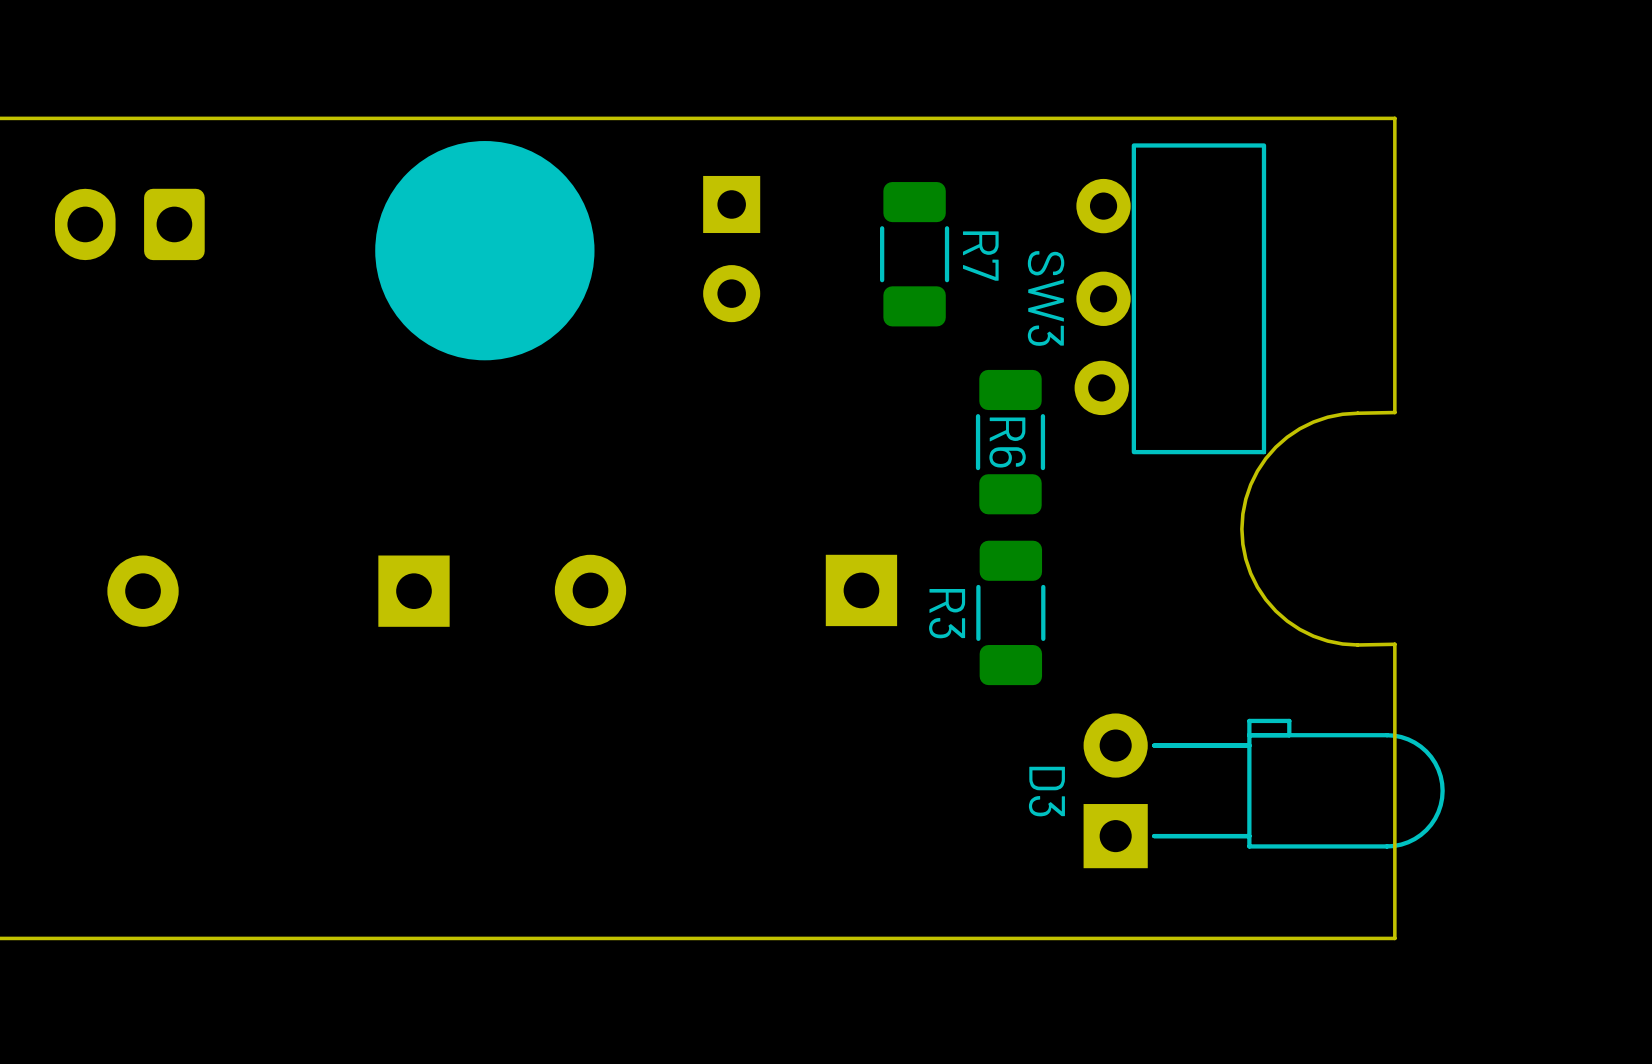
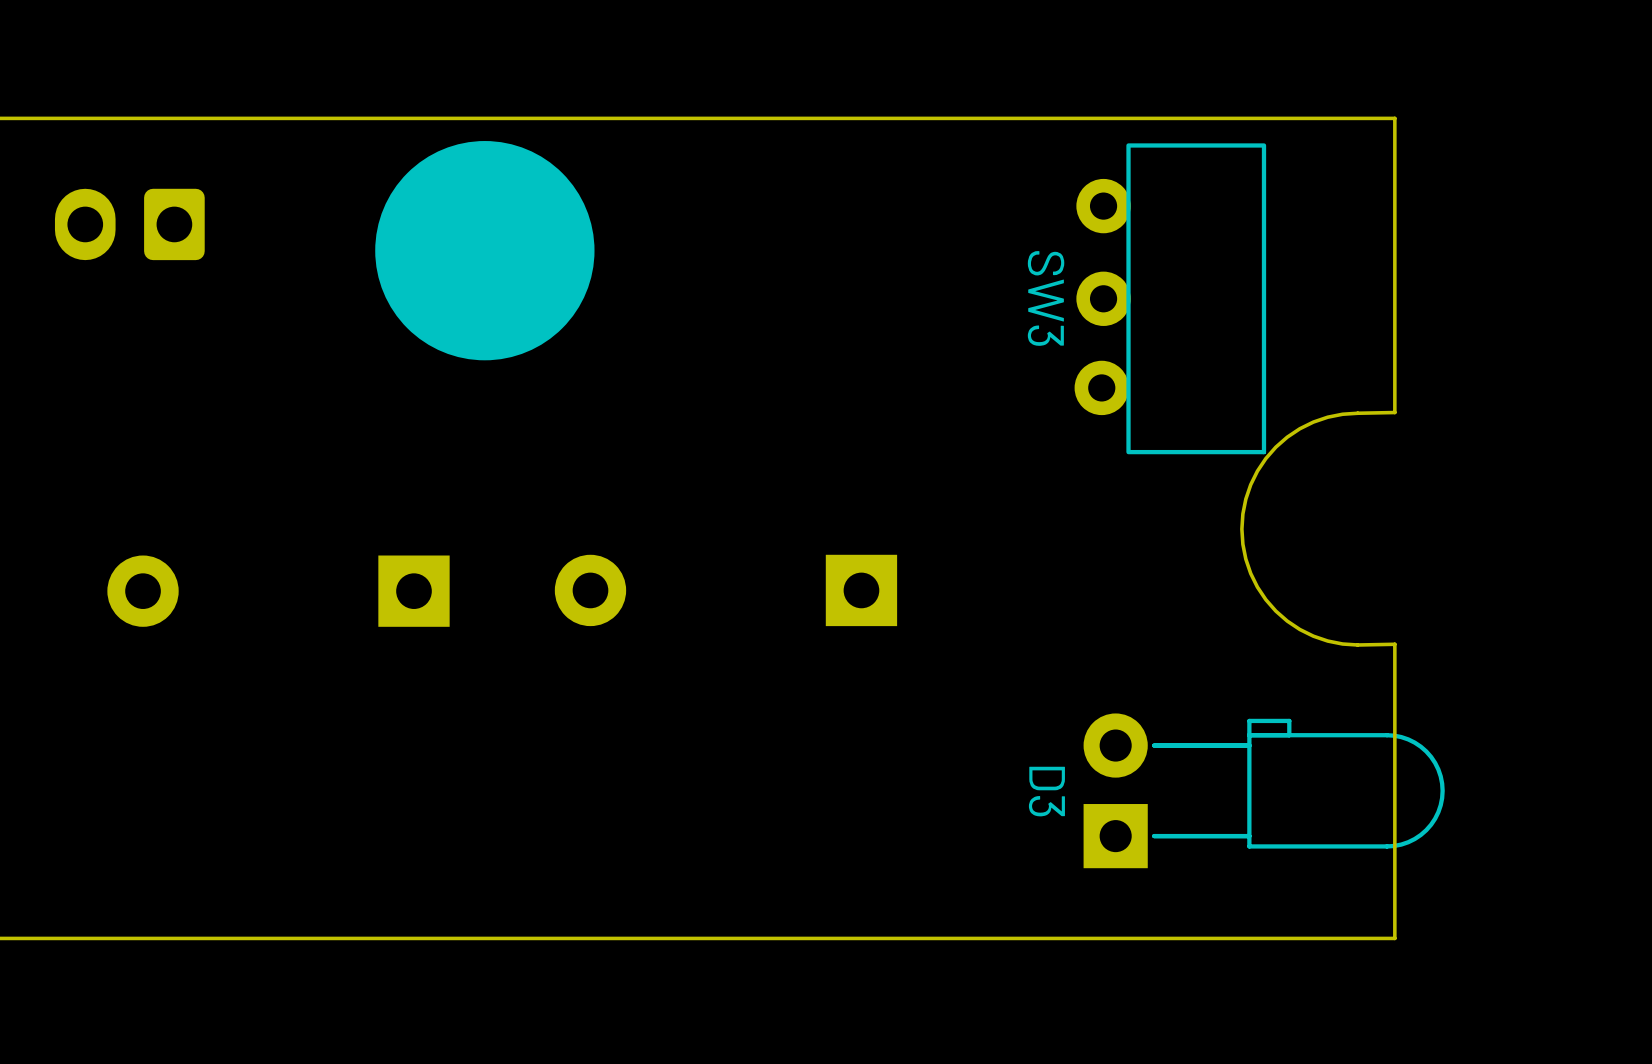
SW3 footprint: [1074, 143, 1267, 455] -> [1074, 143, 1267, 455]
part: (731, 249) -> none
R7: (914, 254) -> none
R6: (1010, 442) -> none
R3: (1010, 612) -> none

